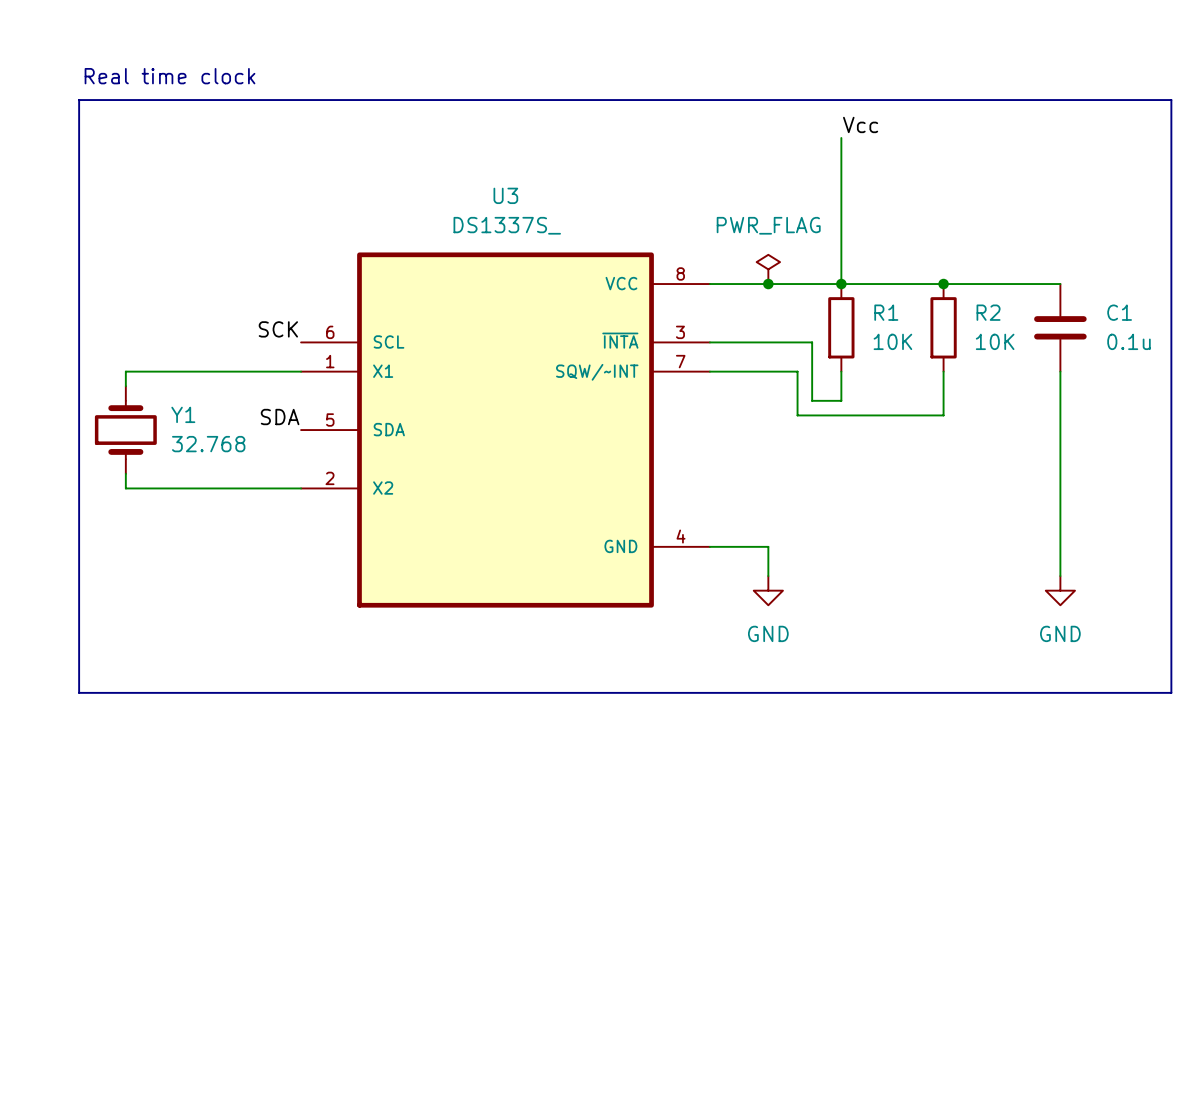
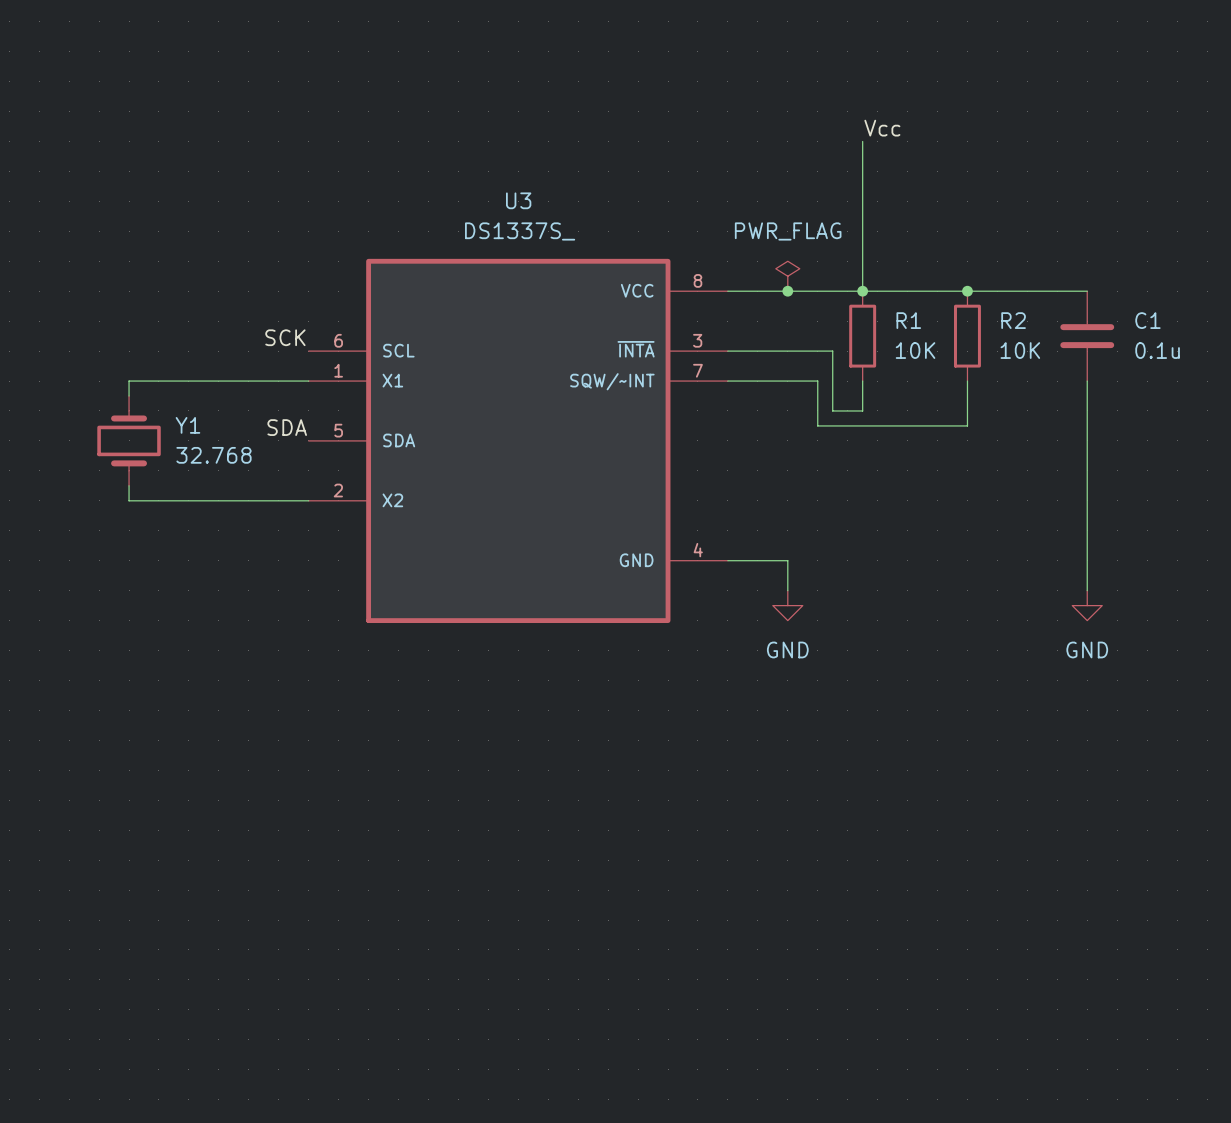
text: Real time clock (170, 76) -> none
line: (79, 100) (1171, 100) (1171, 692) (79, 692) (79, 100) -> none

